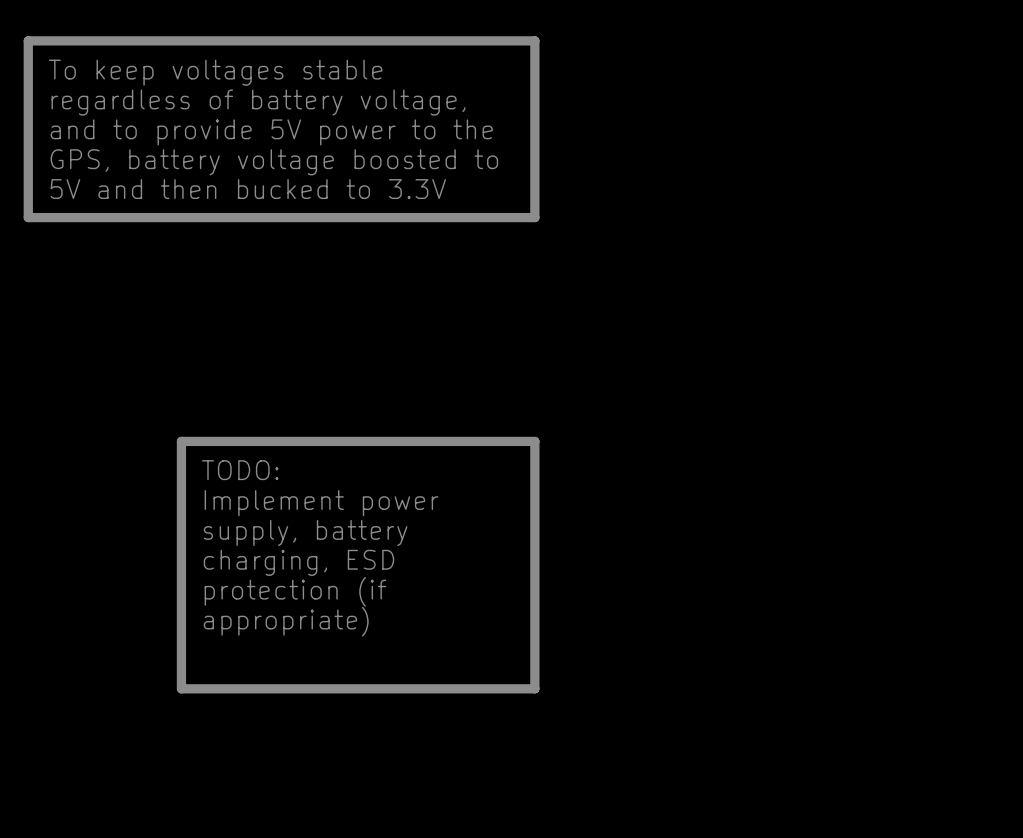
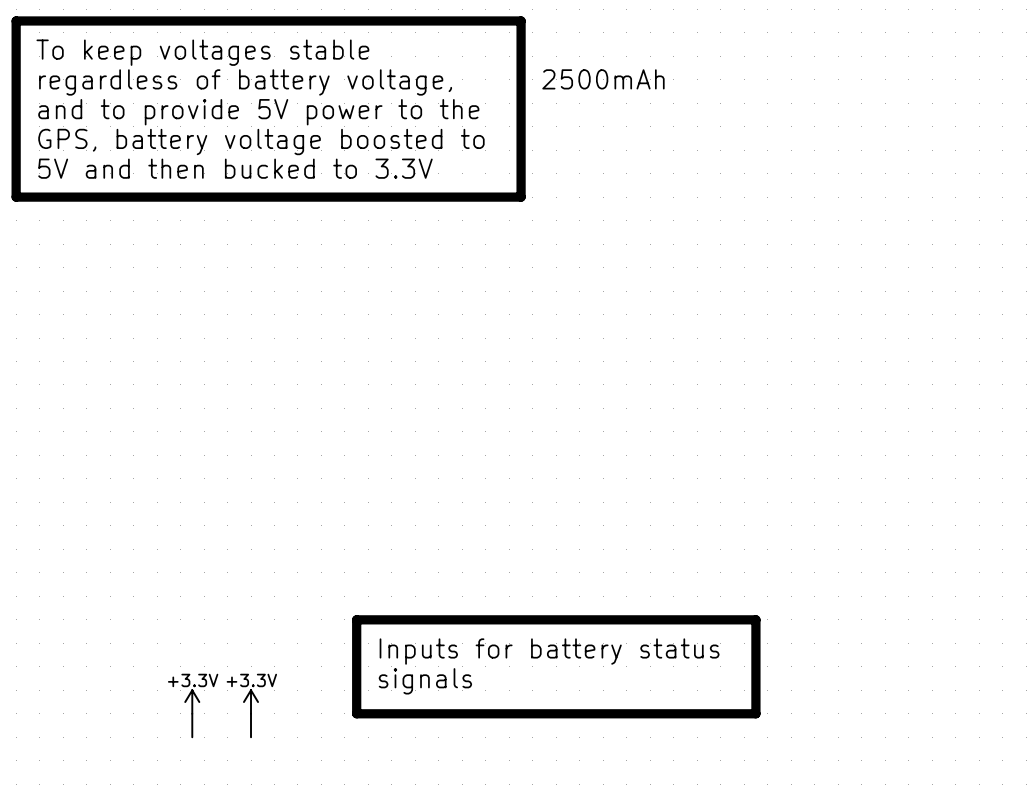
text: none -> 2500mAh (603, 79)
line: (181, 441) (534, 441) (534, 688) (181, 688) (181, 441) -> none
text: TODO: (240, 470) -> none
text: Implement power (321, 503) -> none
text: supply, battery (305, 532) -> none
text: charging, ESD (298, 562) -> none
text: protection (if (295, 591) -> none
text: appropriate) (286, 621) -> none
line: none -> (356, 619) (755, 619) (755, 713) (356, 713) (356, 619)
text: none -> Inputs for battery status (549, 651)
text: none -> signals (425, 681)
power symbol: none -> +3.3V (192, 702)
power symbol: none -> +3.3V (251, 702)
wire: none -> (192, 713) (192, 737)
wire: none -> (251, 713) (251, 737)

